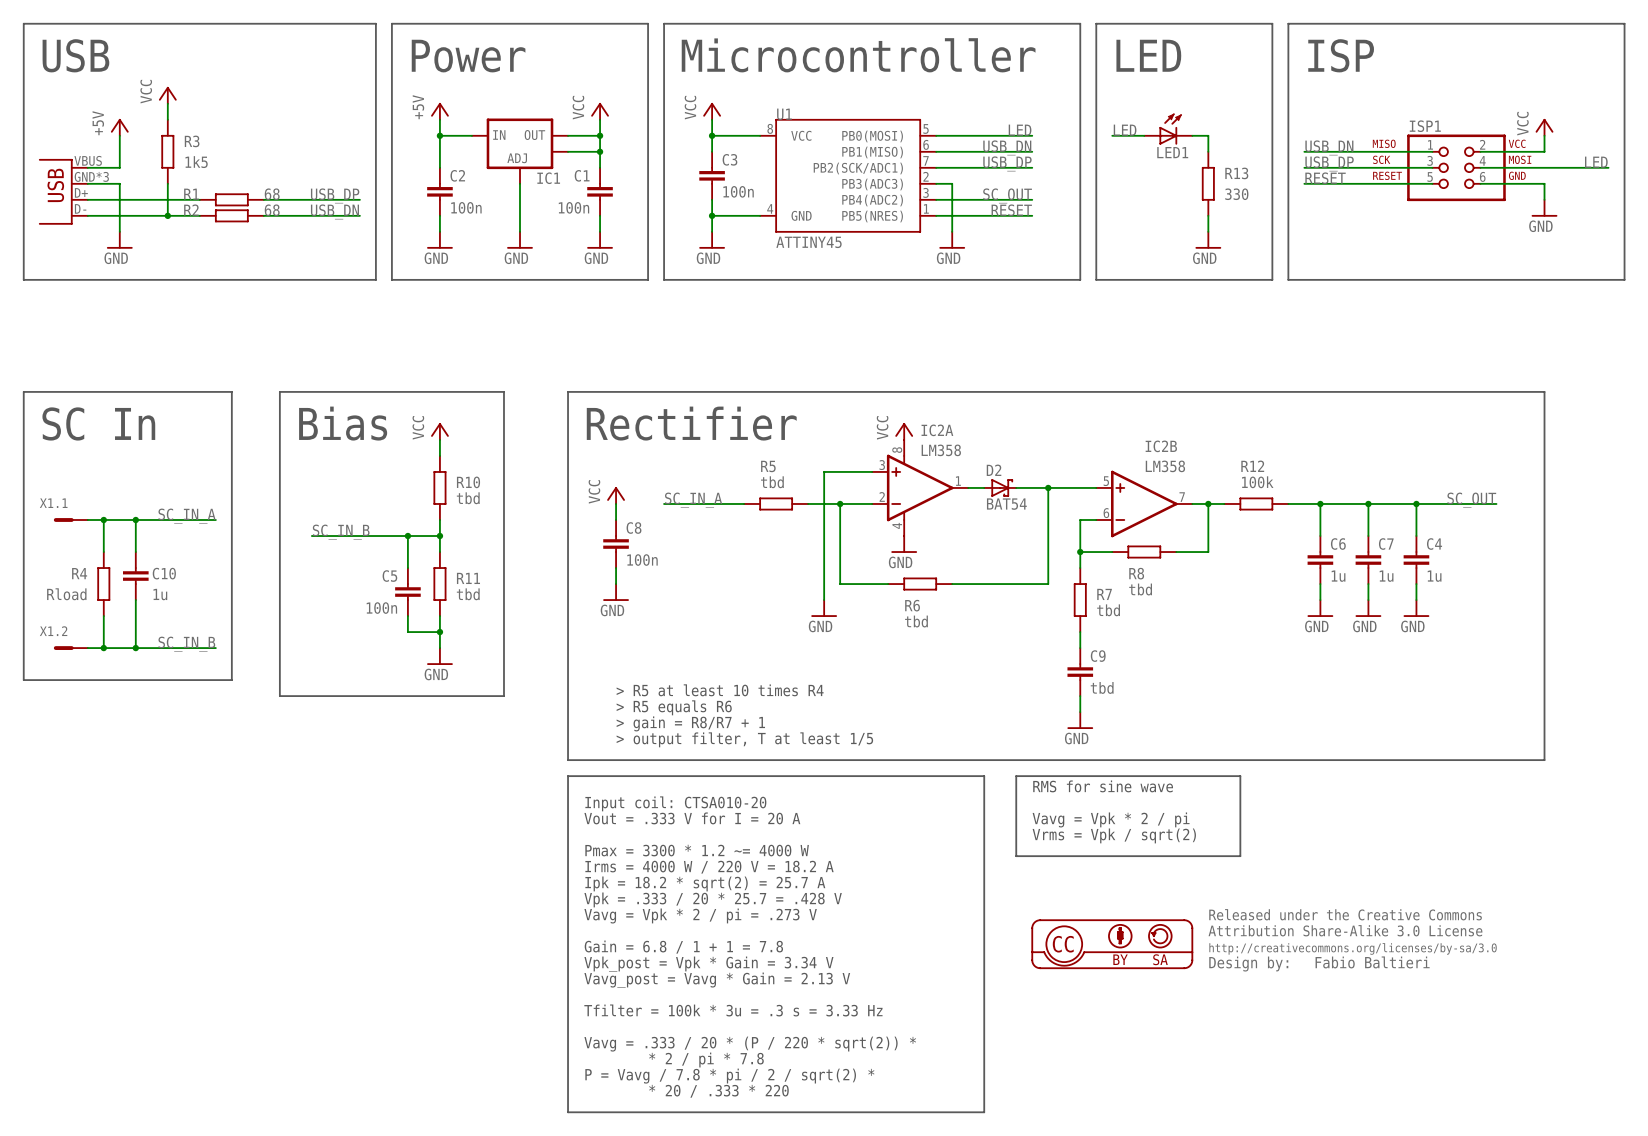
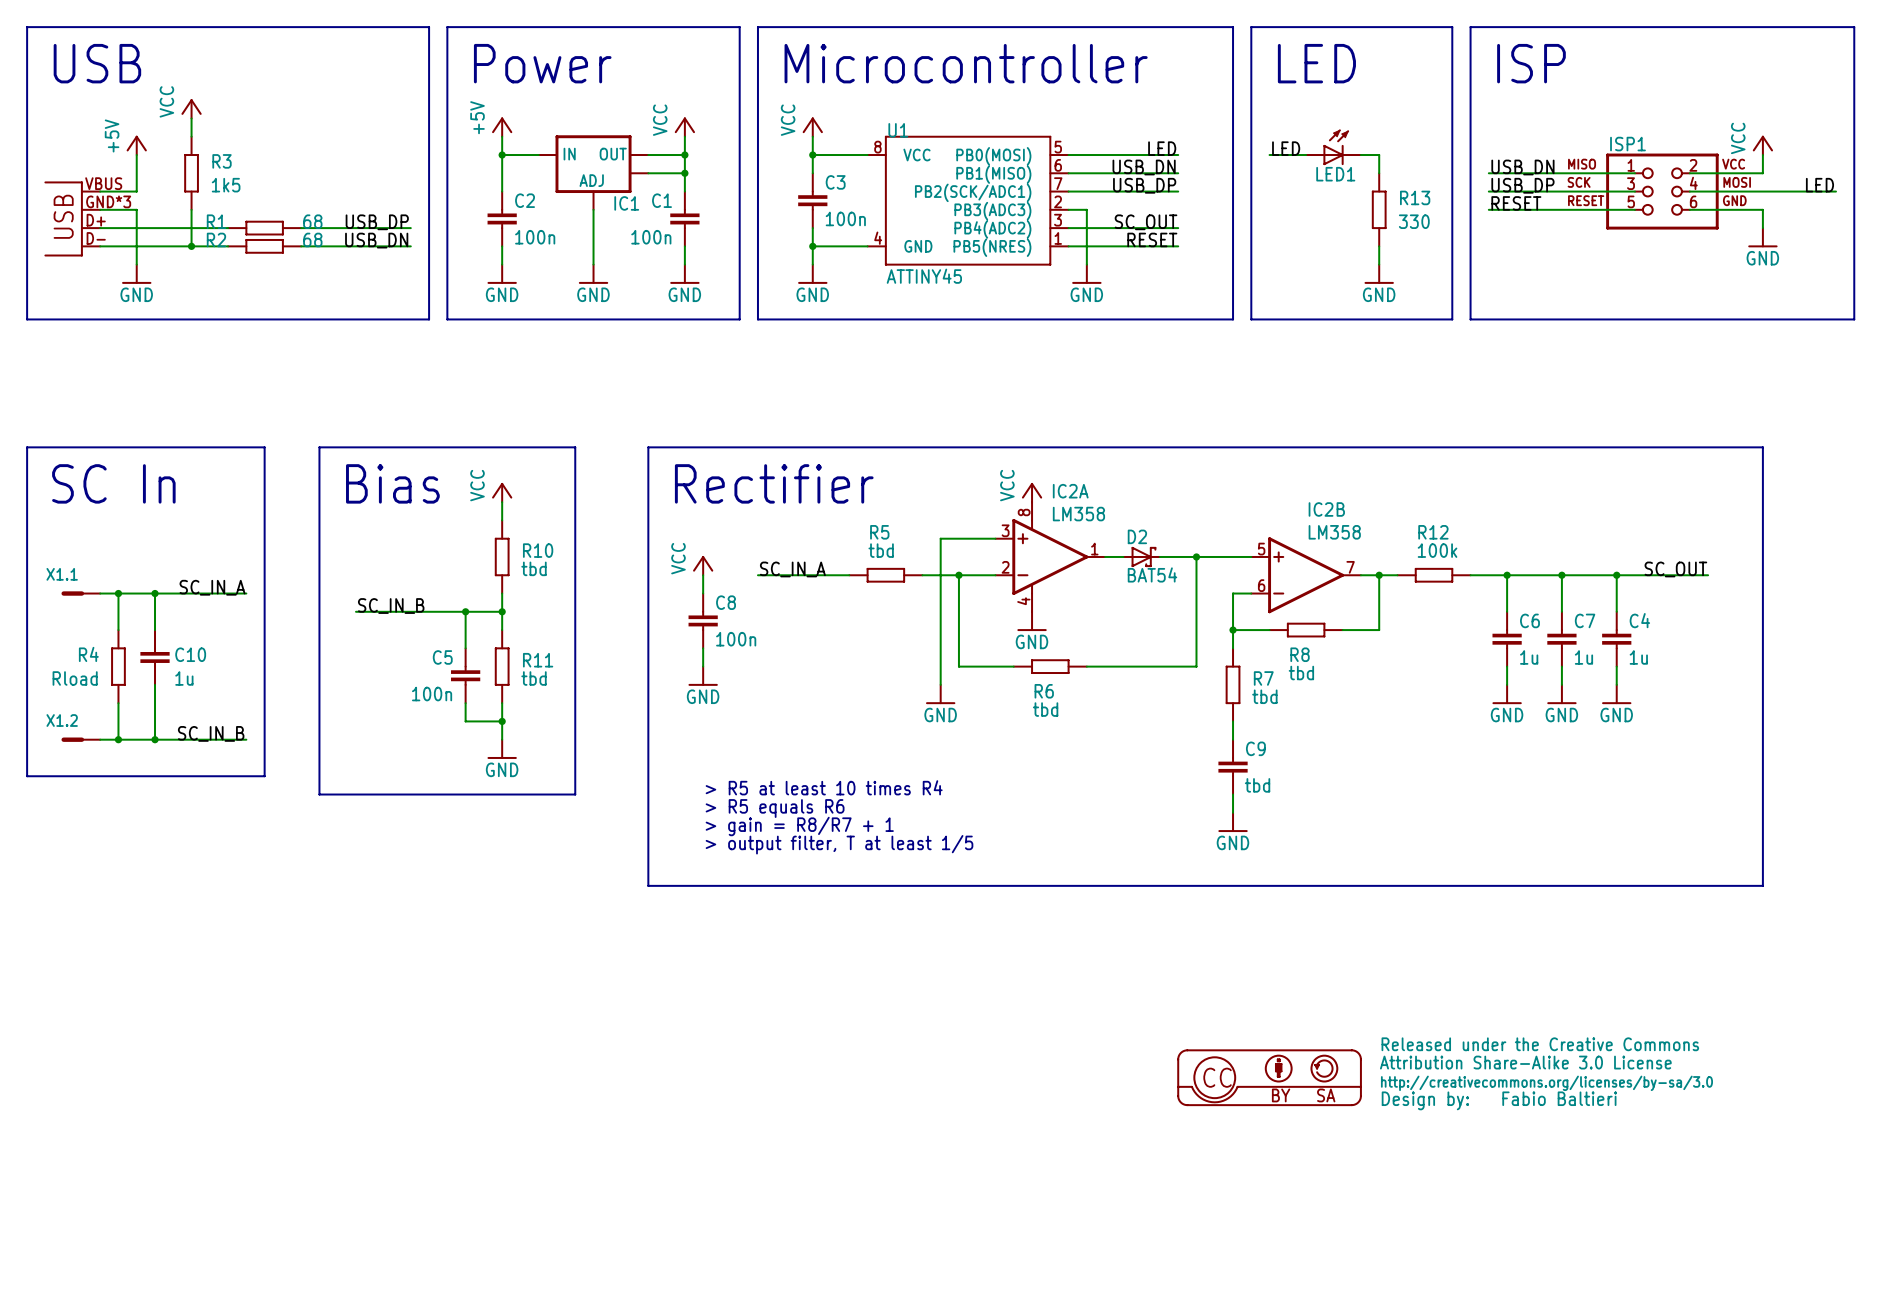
line: (568, 760) (1544, 760) -> (1415, 885) (1762, 885) (1762, 867)
line: (568, 776) (568, 1112) (984, 1112) (984, 776) -> (648, 885) (648, 867)
line: (1016, 776) (1016, 856) (1240, 856) (1240, 776) -> (1159, 885) (1123, 885)
text: RMS for sine wave (1103, 786) -> none
text: Input coil: CTSA010-20 (675, 803) -> none
text: Vout = .333 V for I = 20 A (692, 818) -> none
text: Vavg = Vpk * 2 / pi (1111, 819) -> none
text: Vrms = Vpk / sqrt(2) (1114, 835) -> none
text: Pmax = 3300 * 1.2 ~= 4000 W (697, 850) -> none
text: Irms = 4000 W / 220 V = 18.2 A (709, 867) -> none
text: Ipk = 18.2 * sqrt(2) = 25.7 A (705, 883) -> none
text: Vpk = .333 / 20 * 25.7 = .428 V (713, 899) -> none
text: Vavg = Vpk * 2 / pi = .273 V (700, 916) -> none
text: Gain = 6.8 / 1 + 1 = 7.8 (683, 947) -> none
text: Vpk_post = Vpk * Gain = 3.34 V (708, 964) -> none
text: Vavg_post = Vavg * Gain = 2.13 V (717, 980) -> none
text: Tfilter = 100k * 3u = .3 s = 3.33 Hz (733, 1010) -> none
text: Vavg = .333 / 20 * (P / 220 * sqrt(2)) * (750, 1044) -> none
text: * 2 / pi * 7.8 (706, 1060) -> none
text: P = Vavg / 7.8 * pi / 2 / sqrt(2) * (729, 1076) -> none
text: * 20 / .333 * 220 (718, 1091) -> none

